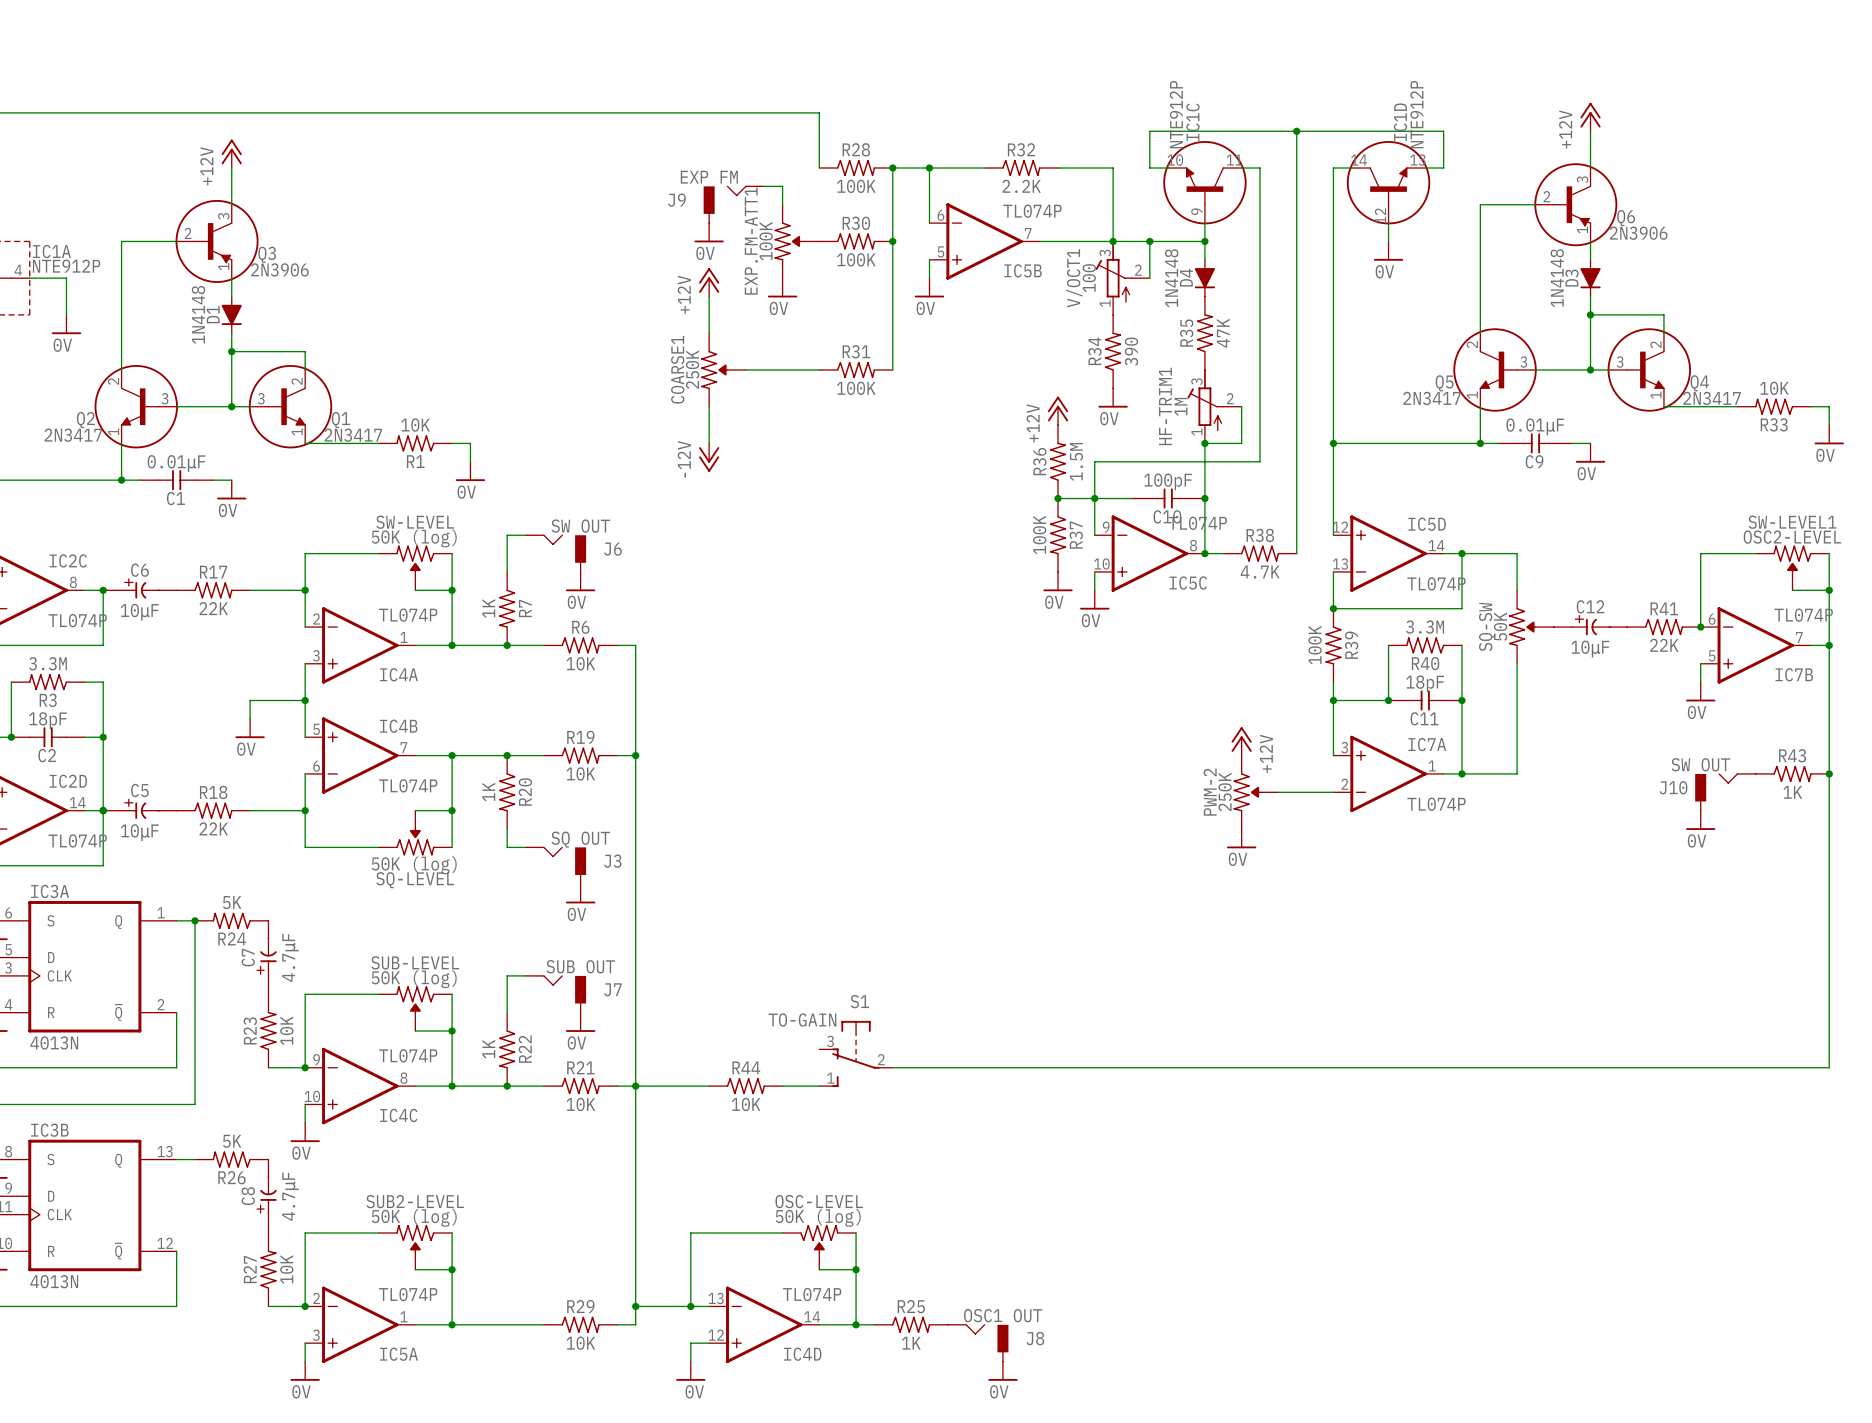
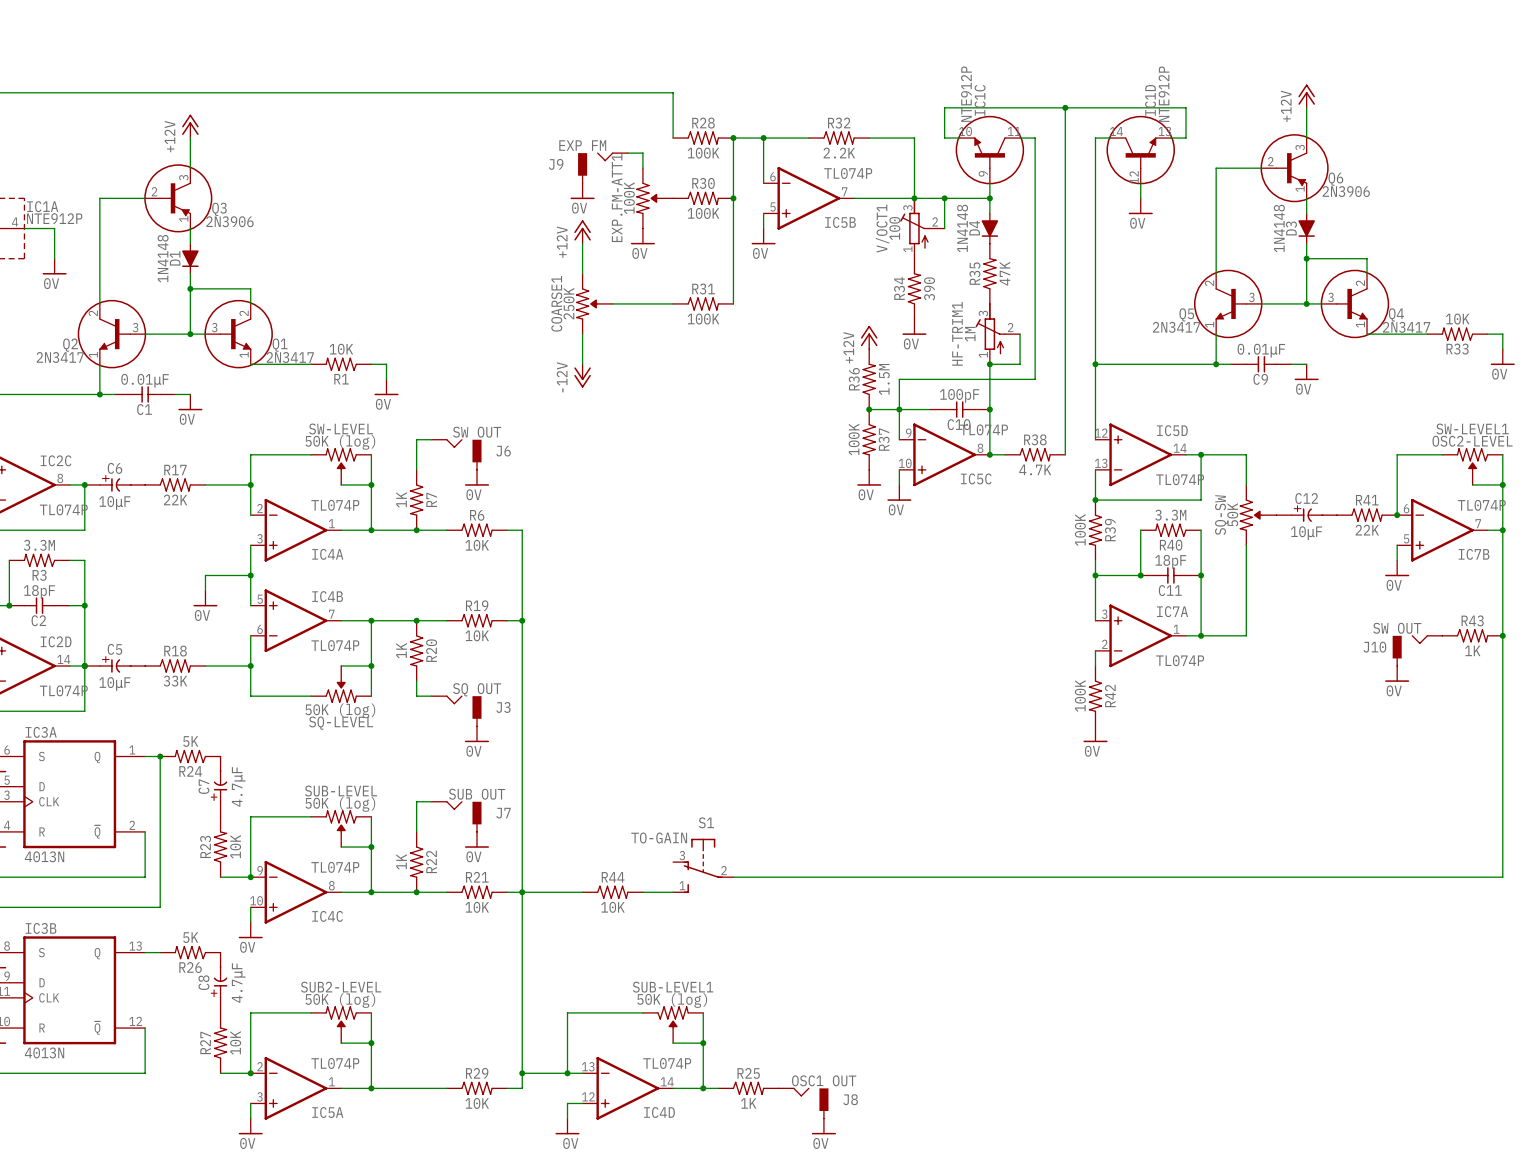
power symbol: +12V (1241, 741) -> none
PWM-2: 250K (1255, 792) -> none
wire: (1278, 792) (1333, 792) -> (1095, 665) (1095, 650)
R18 value: 22K (213, 828) -> 33K (175, 681)
power symbol position: 0V (1241, 838) -> 0V (1095, 734)
R42: none -> 100K (1095, 696)
OSC-LEVEL name: OSC-LEVEL (819, 1201) -> SUB-LEVEL1 (673, 987)

